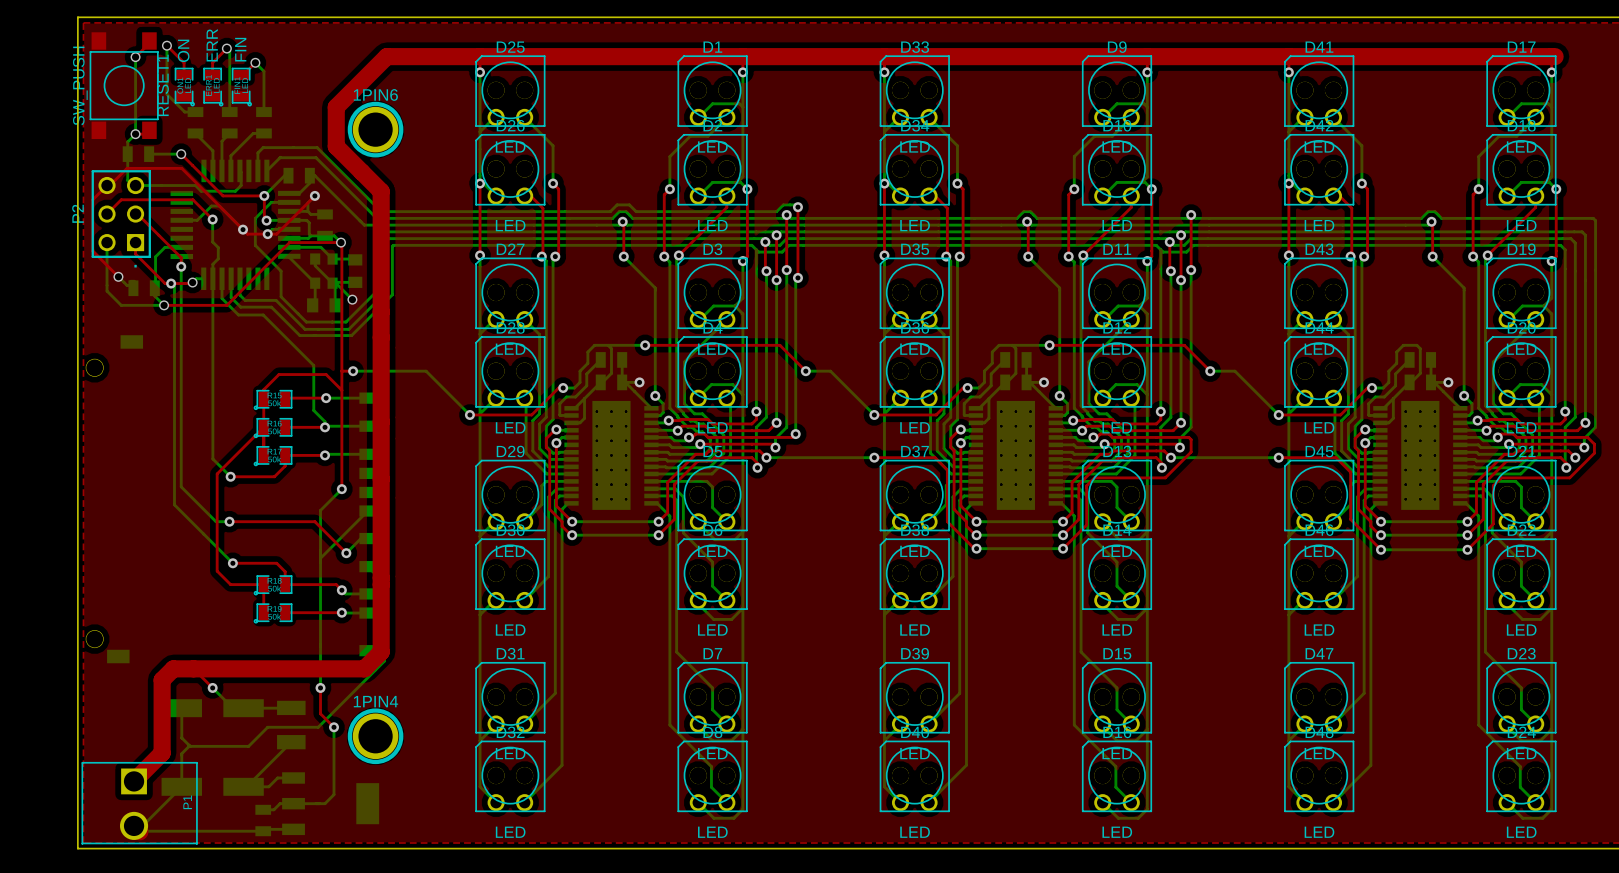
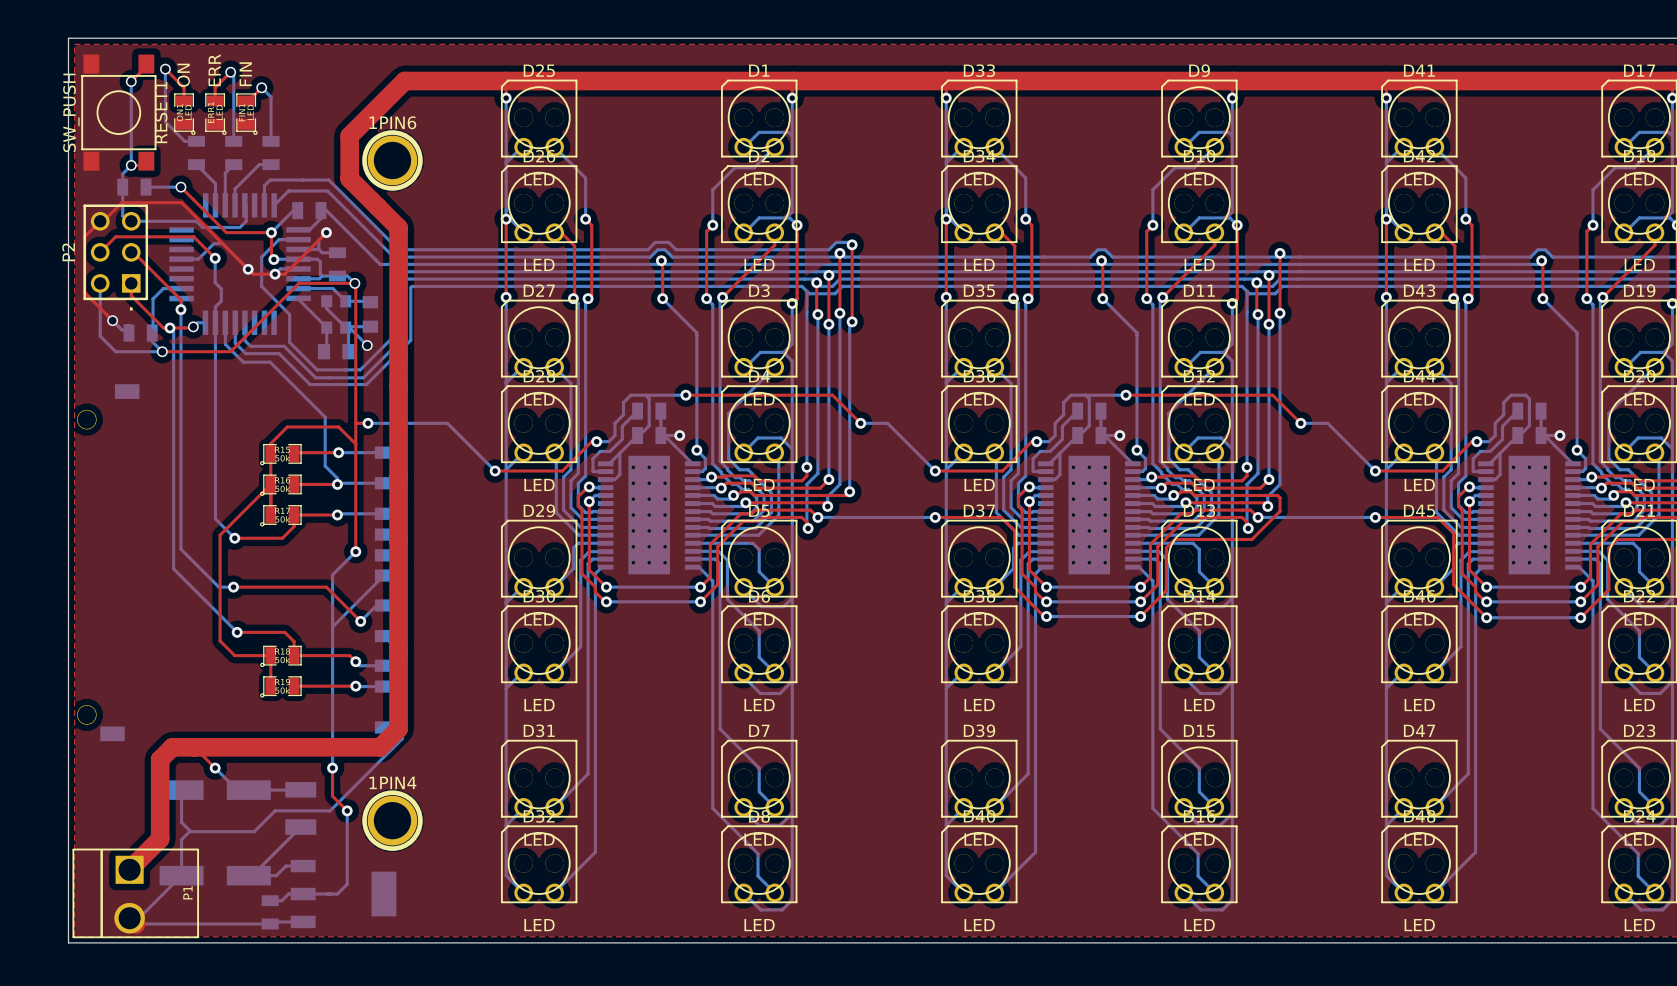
P1 footprint: [81, 761, 198, 845] -> [72, 848, 200, 939]

